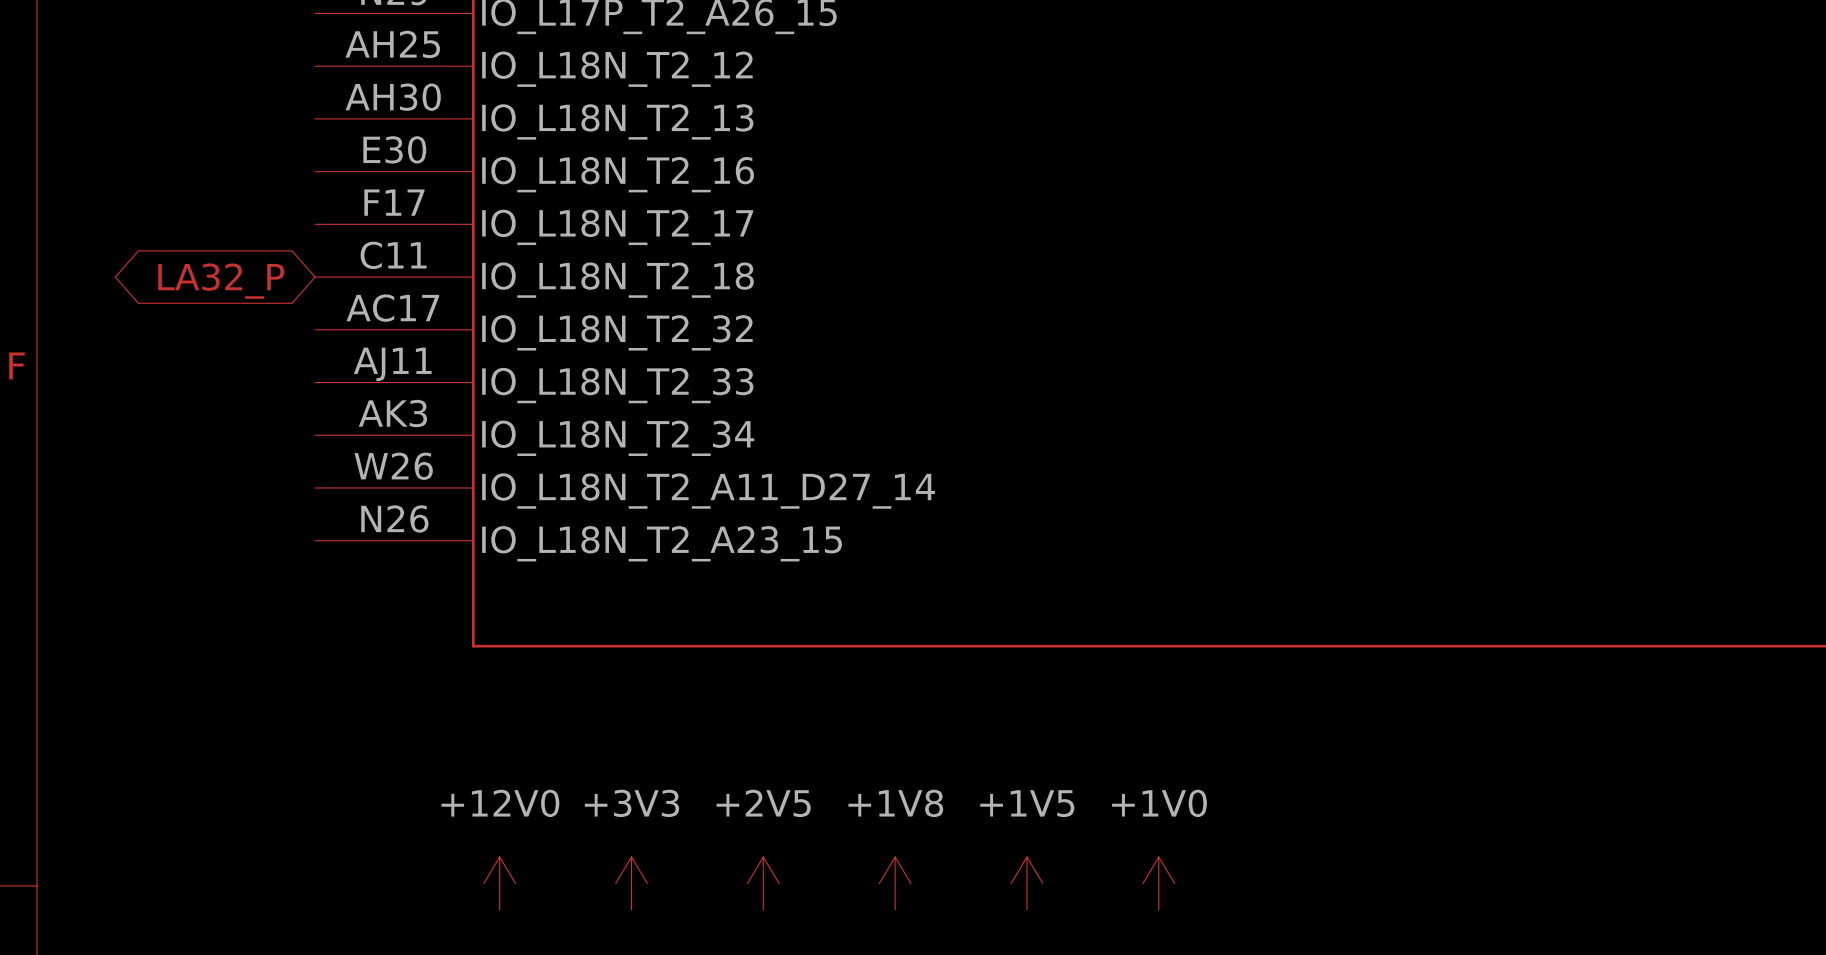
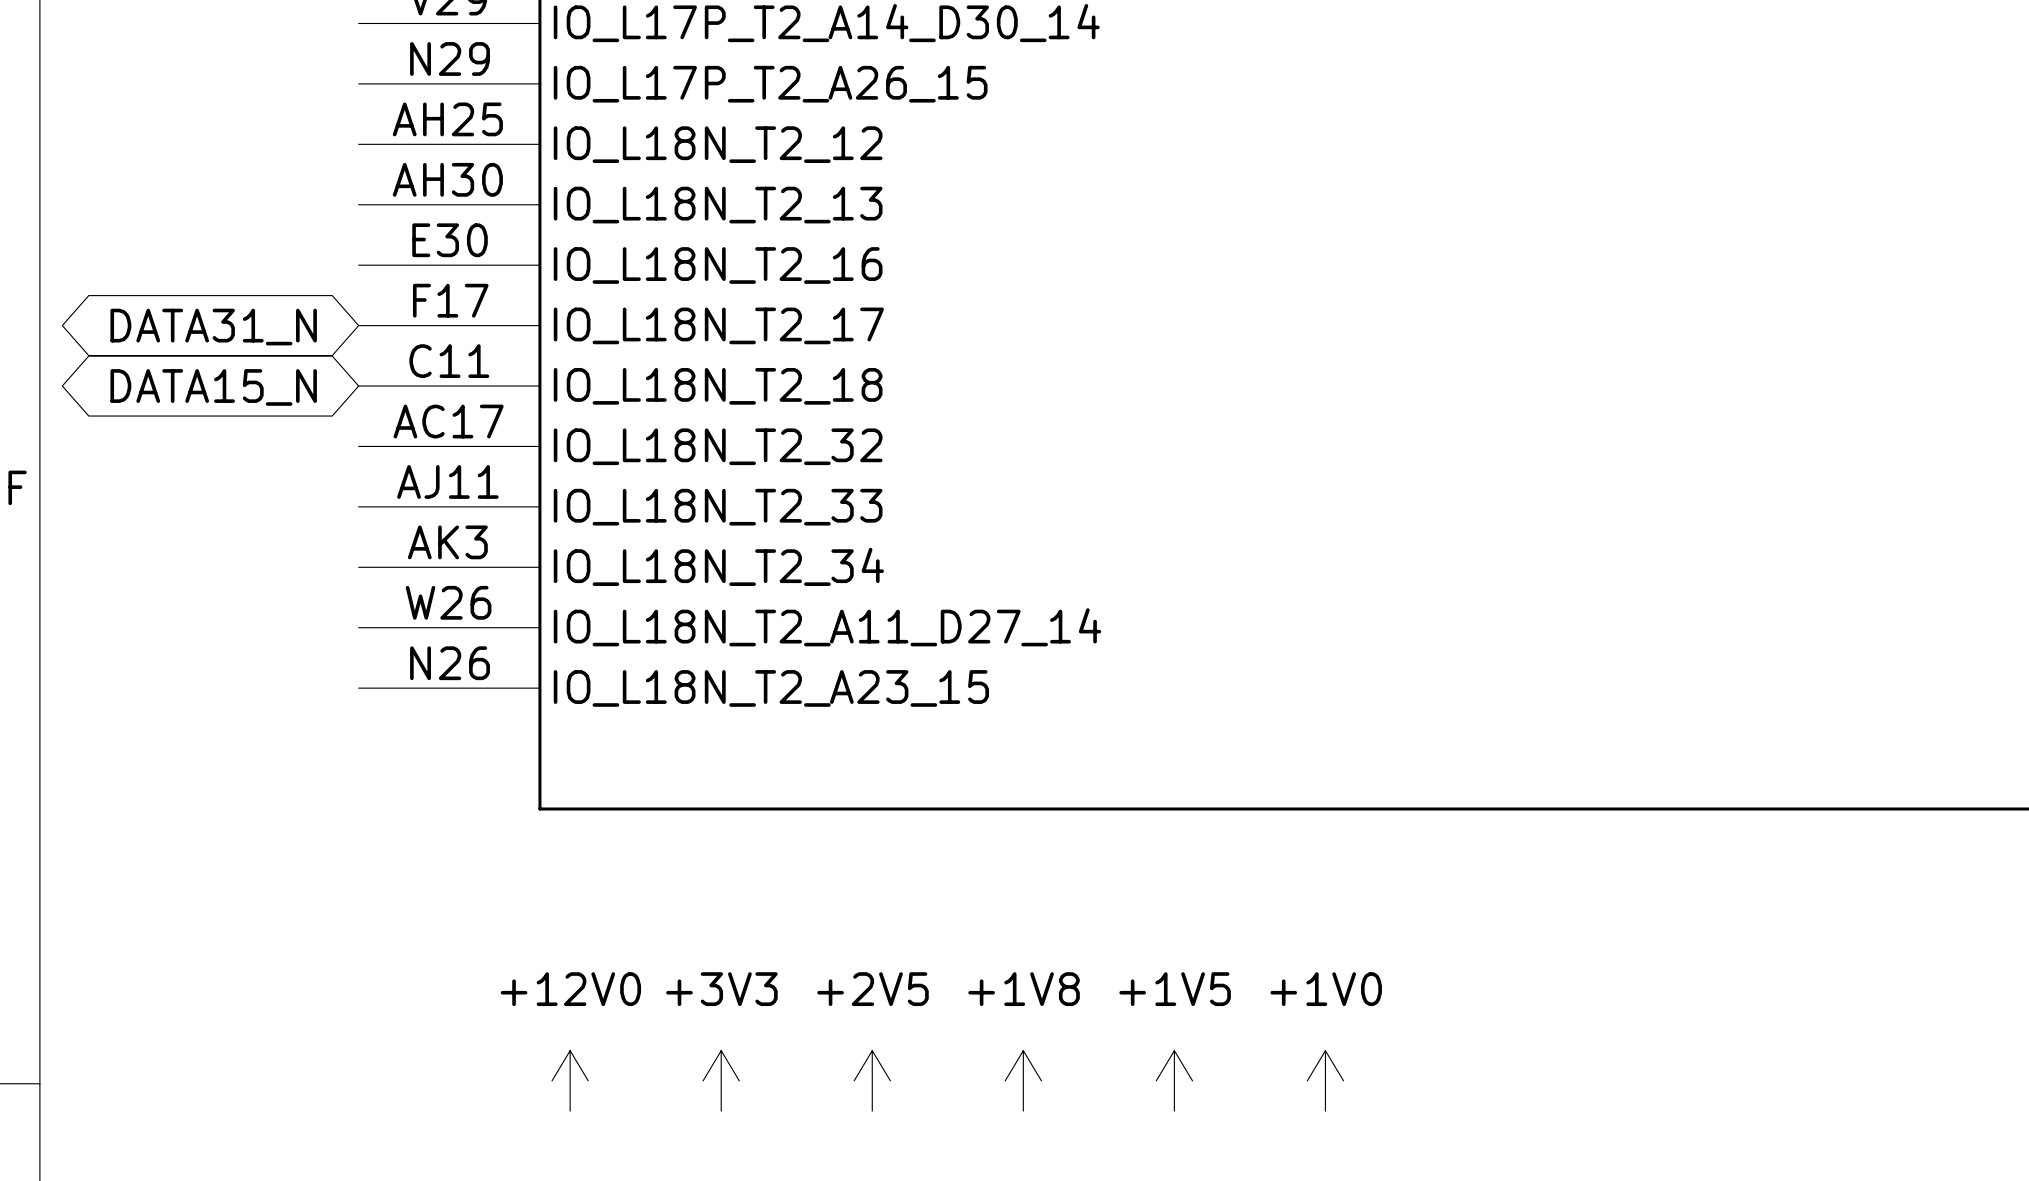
global label: none -> DATA31_N (213, 327)
global label: LA32_P (221, 281) -> DATA15_N (213, 387)

